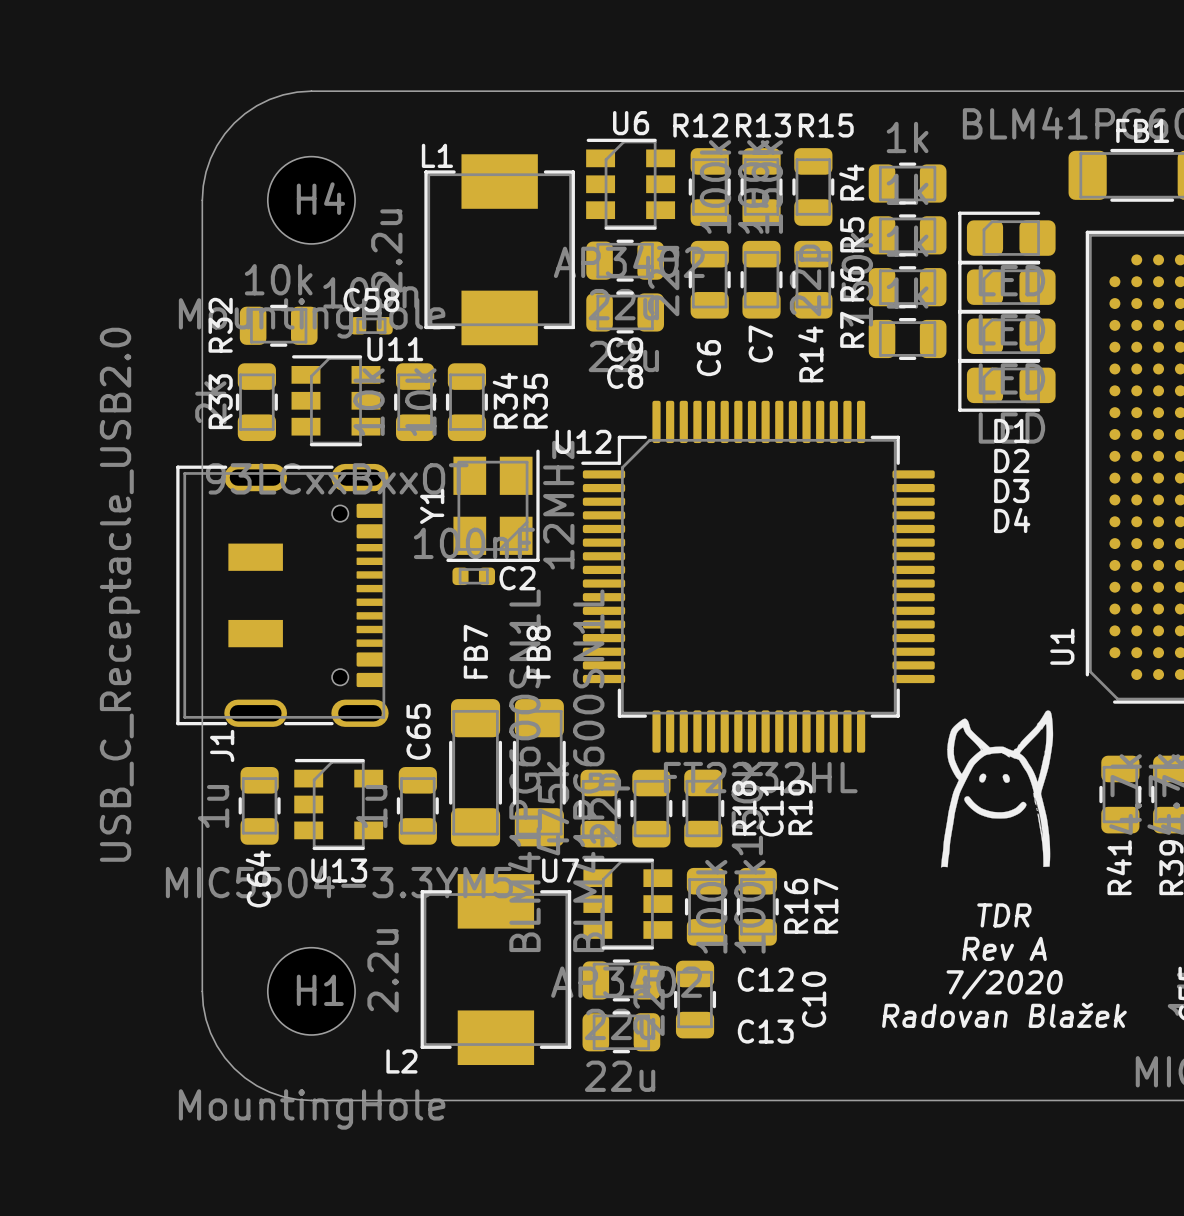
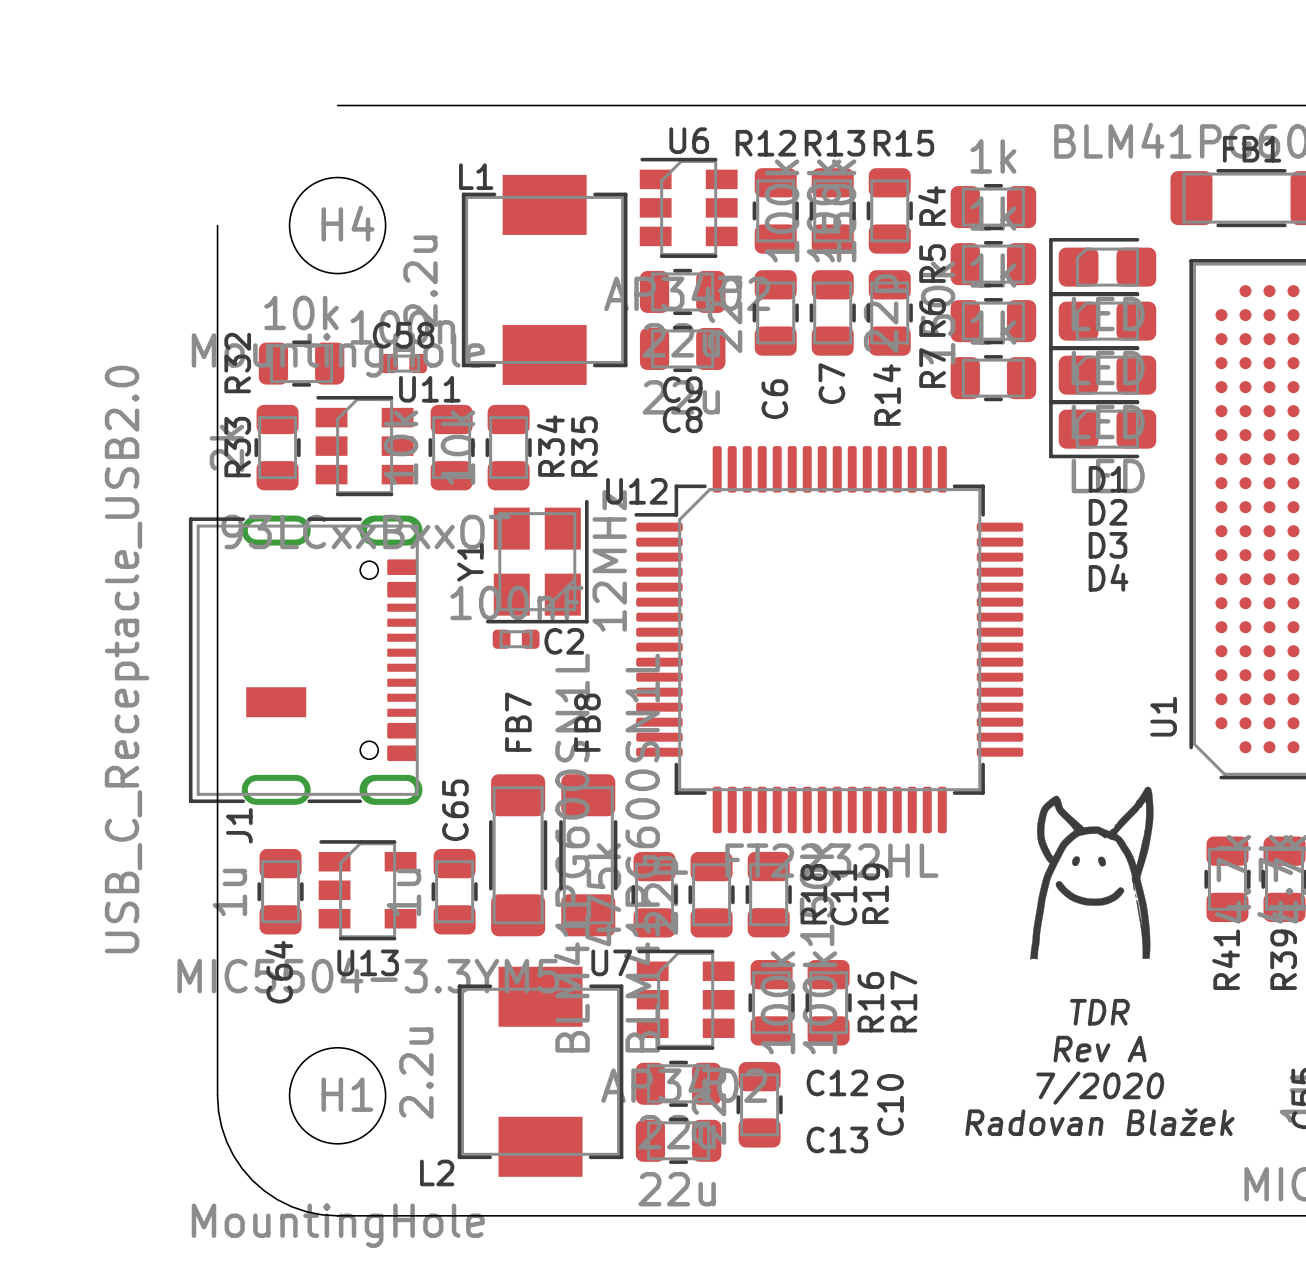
board edge: (311, 91) (297, 92) (269, 99) (256, 105) (234, 123) (224, 133) (210, 158) (206, 172) (202, 200) -> none
J1 footprint: [176, 463, 389, 727] -> [188, 515, 423, 805]

